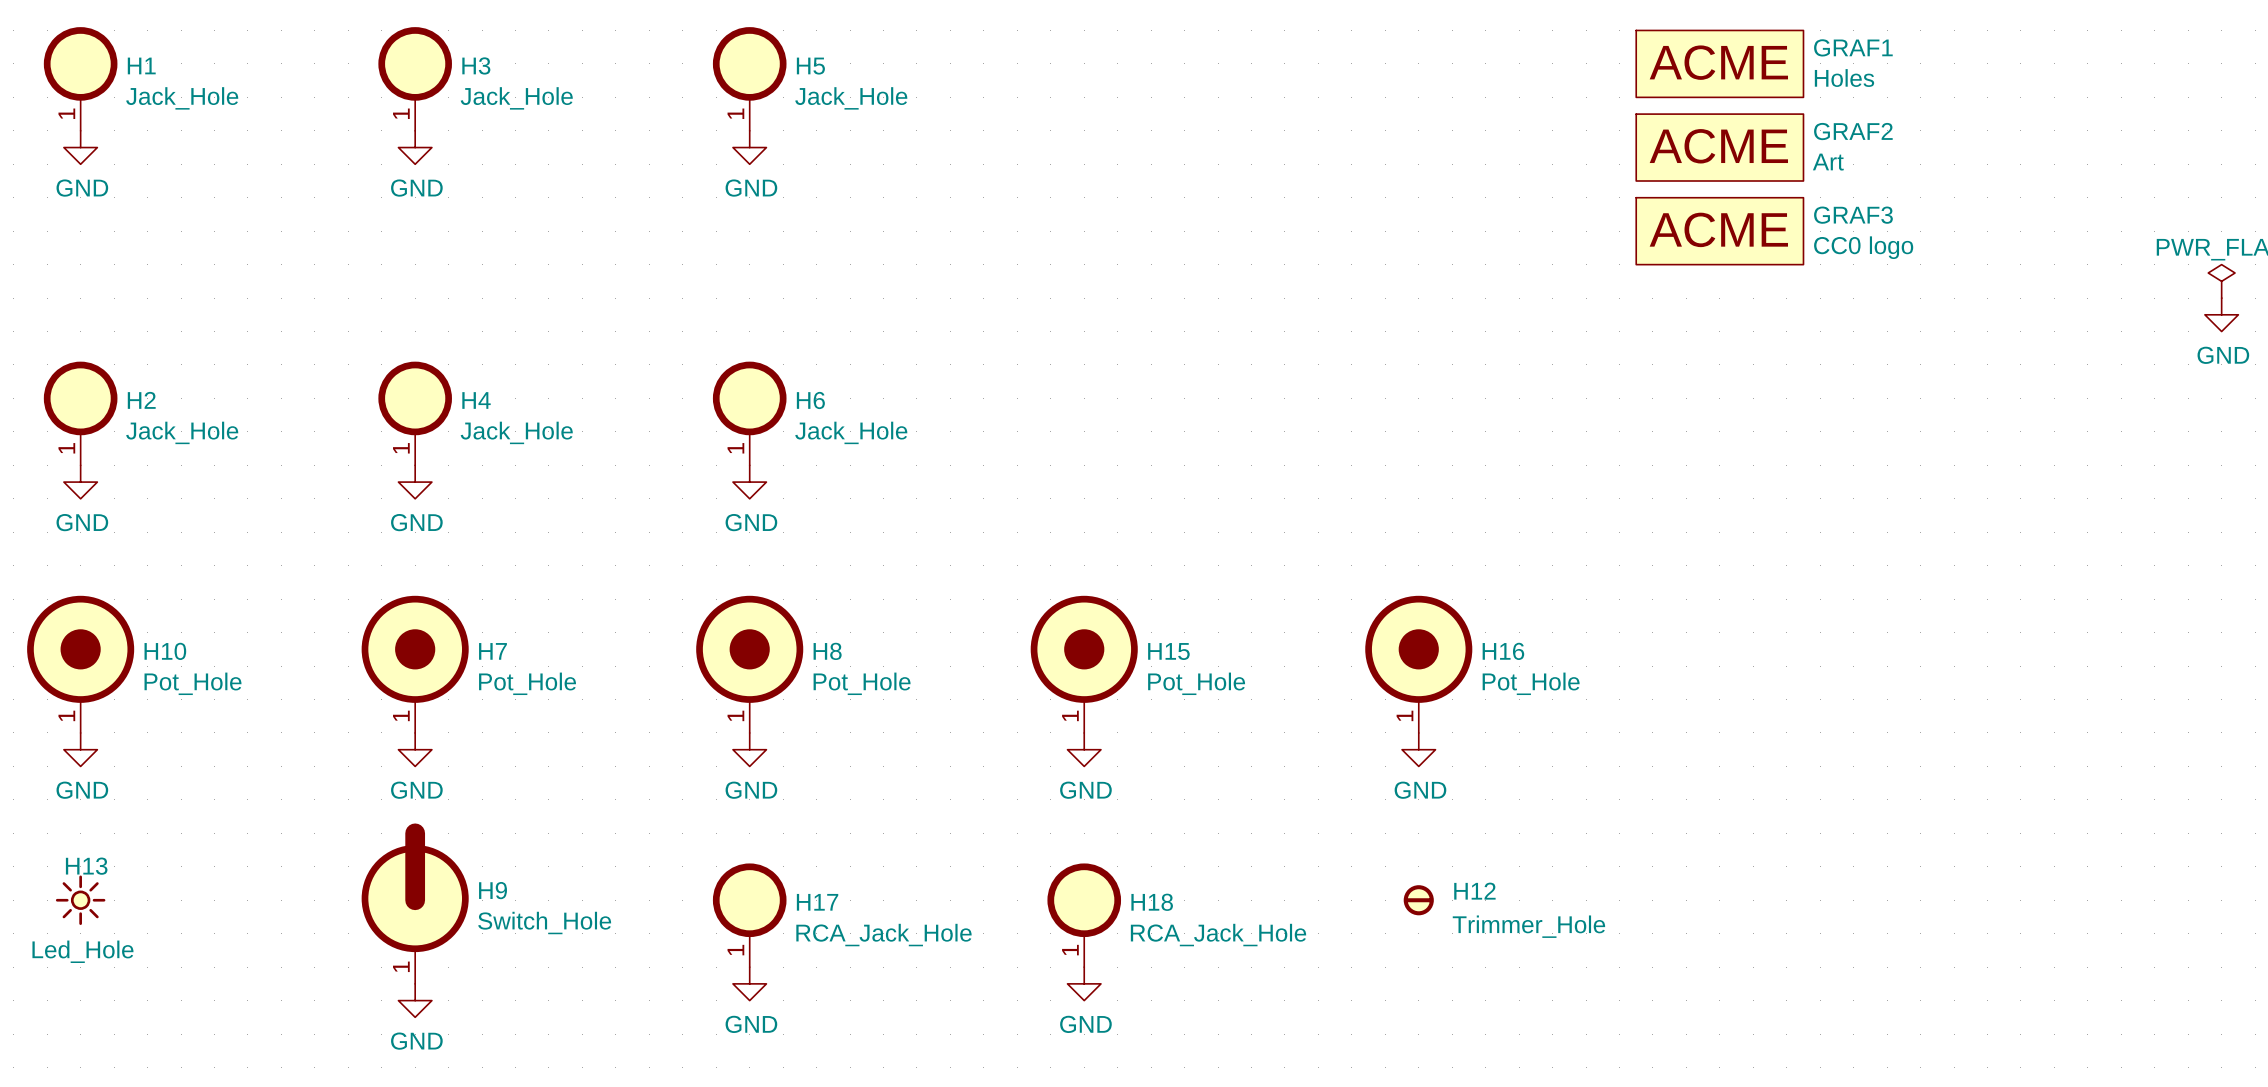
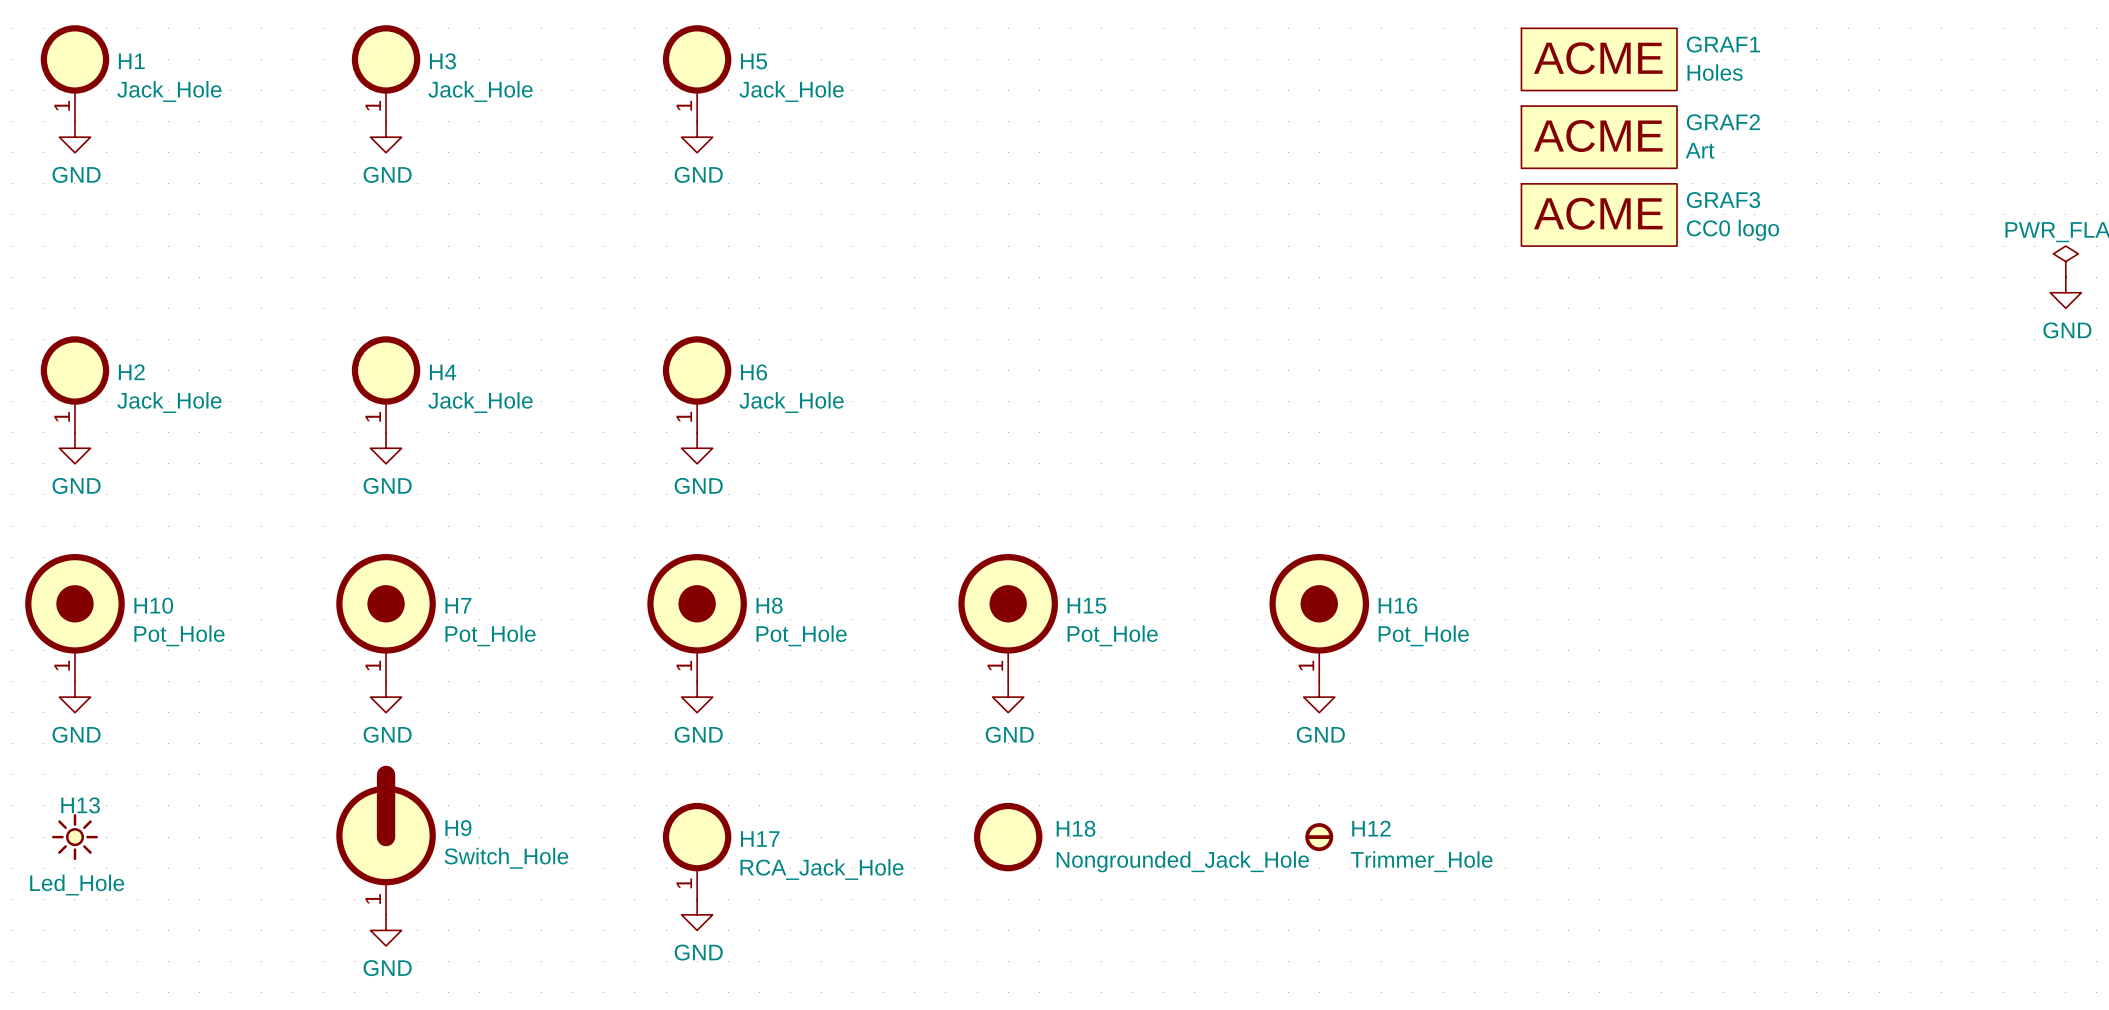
H18 symbol: [1047, 863, 1122, 968] -> [973, 802, 1043, 872]
H18 value: RCA_Jack_Hole (1218, 935) -> Nongrounded_Jack_Hole (1182, 861)
power symbol: GND (1084, 983) -> none

